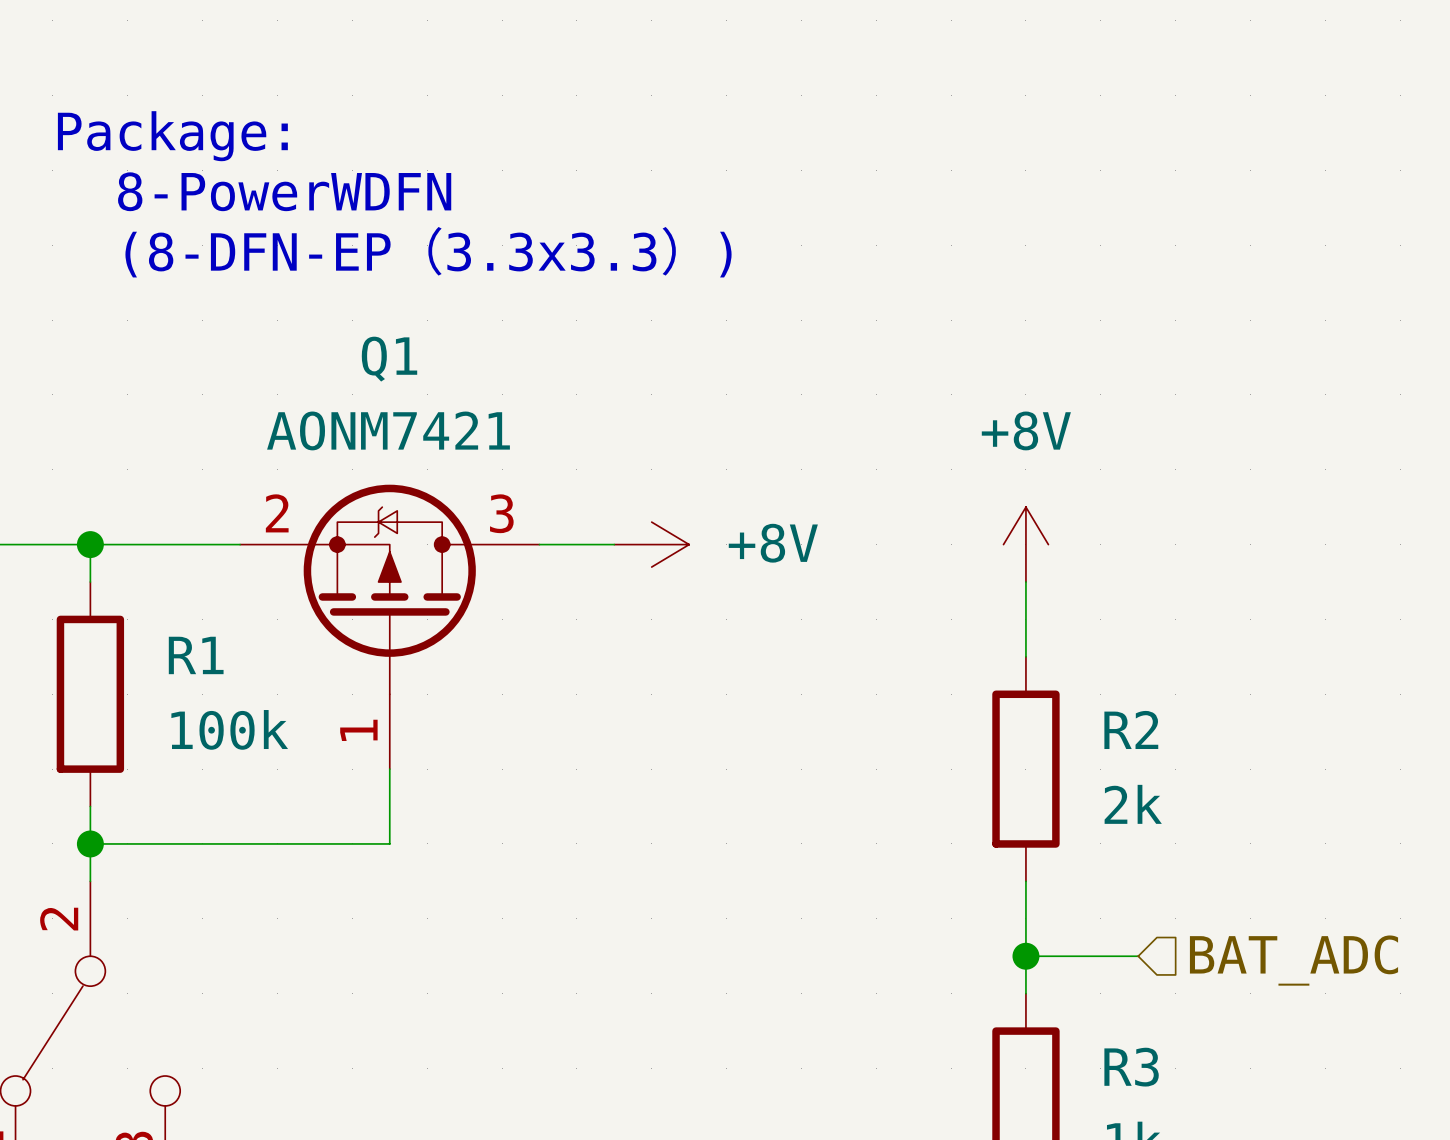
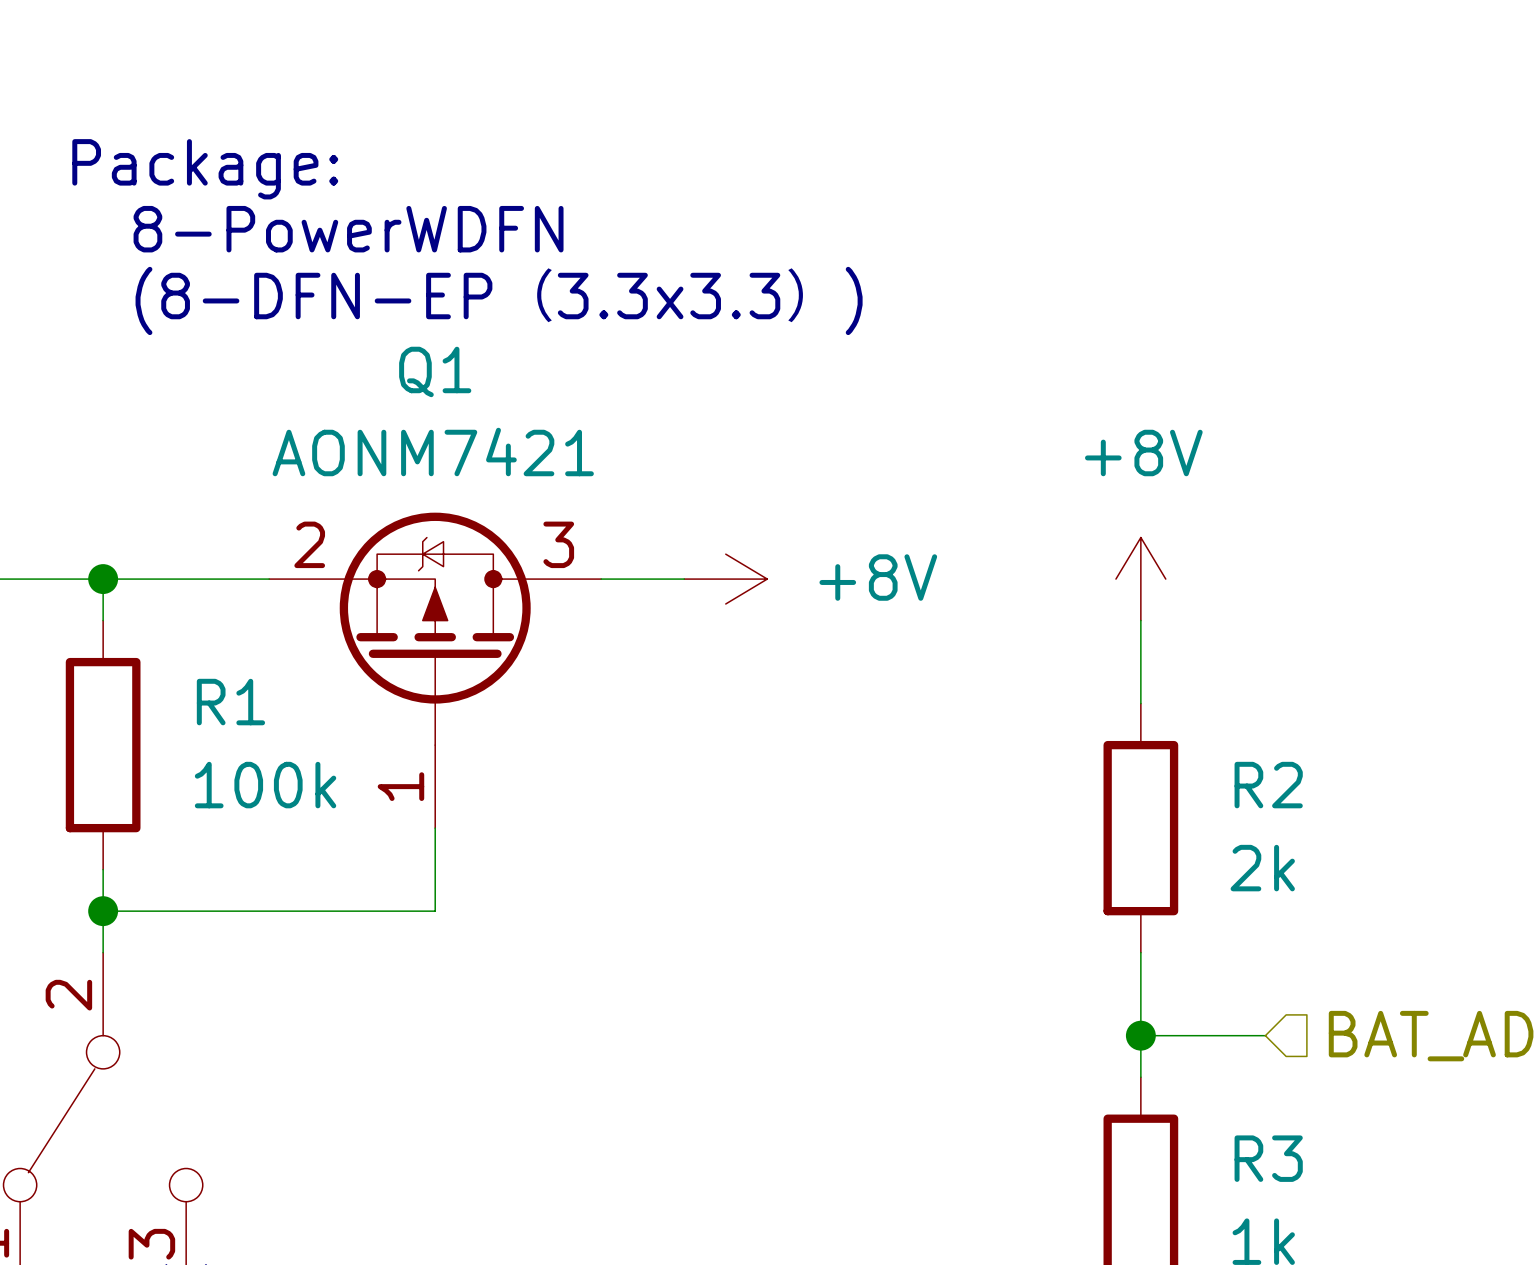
text position: Package: (172, 136) -> Package: (205, 169)
text position: 8-PowerWDFN (284, 191) -> 8-PowerWDFN (348, 229)
text position: (8-DFN-EP（3.3x3.3）) (428, 252) -> (8-DFN-EP（3.3x3.3）) (499, 300)

